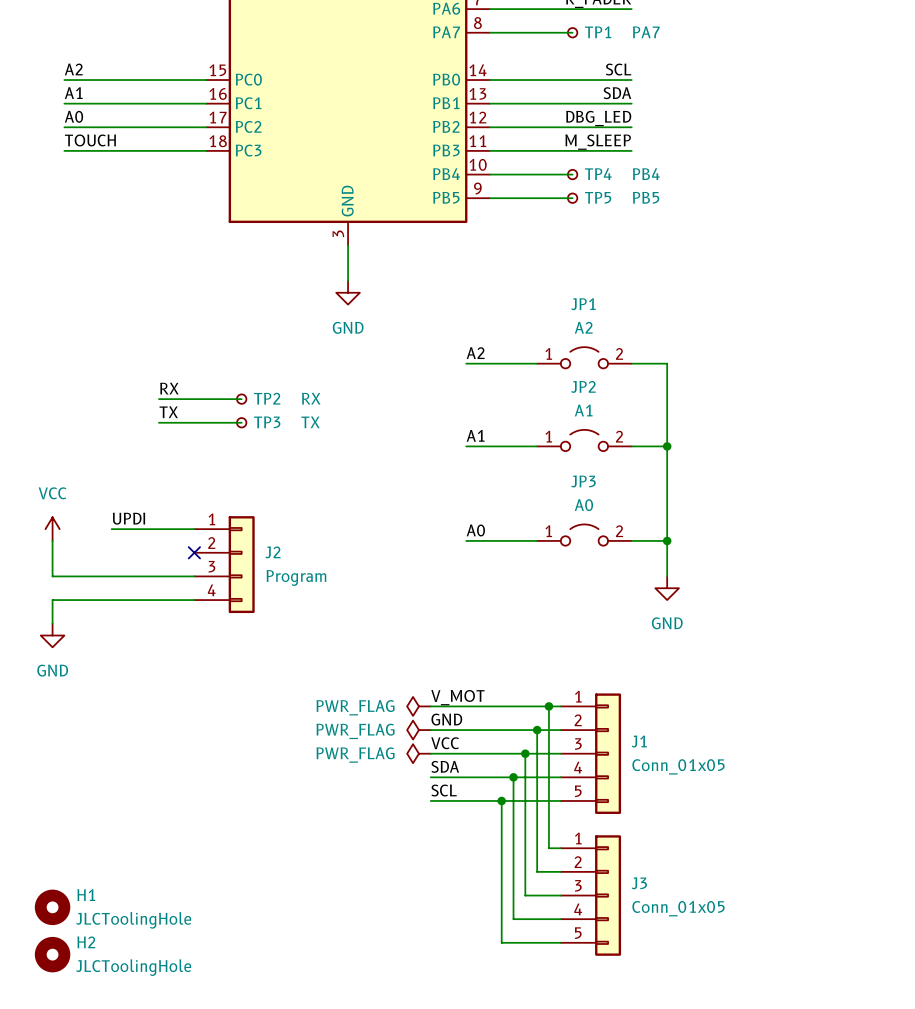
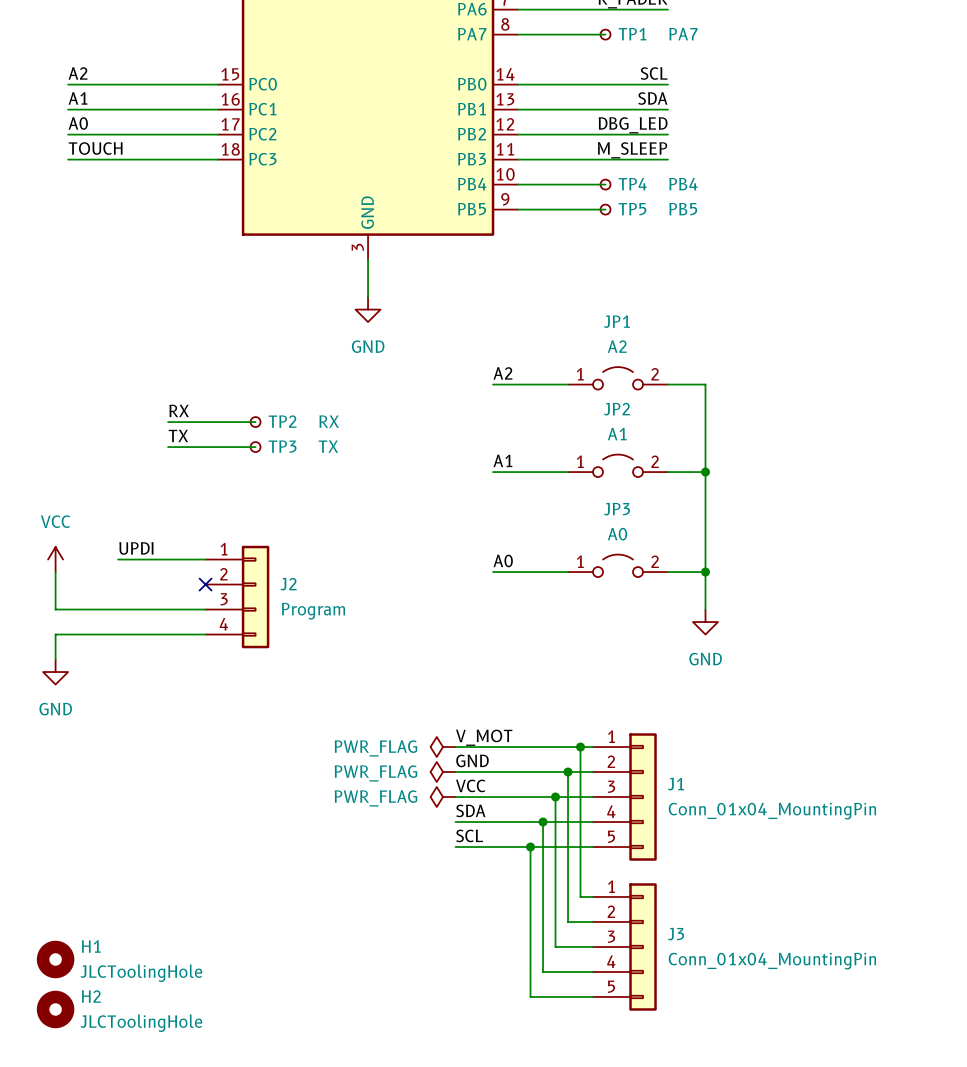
J1 value: Conn_01x05 (678, 766) -> Conn_01x04_MountingPin (772, 811)
J3 value: Conn_01x05 (678, 908) -> Conn_01x04_MountingPin (772, 961)

